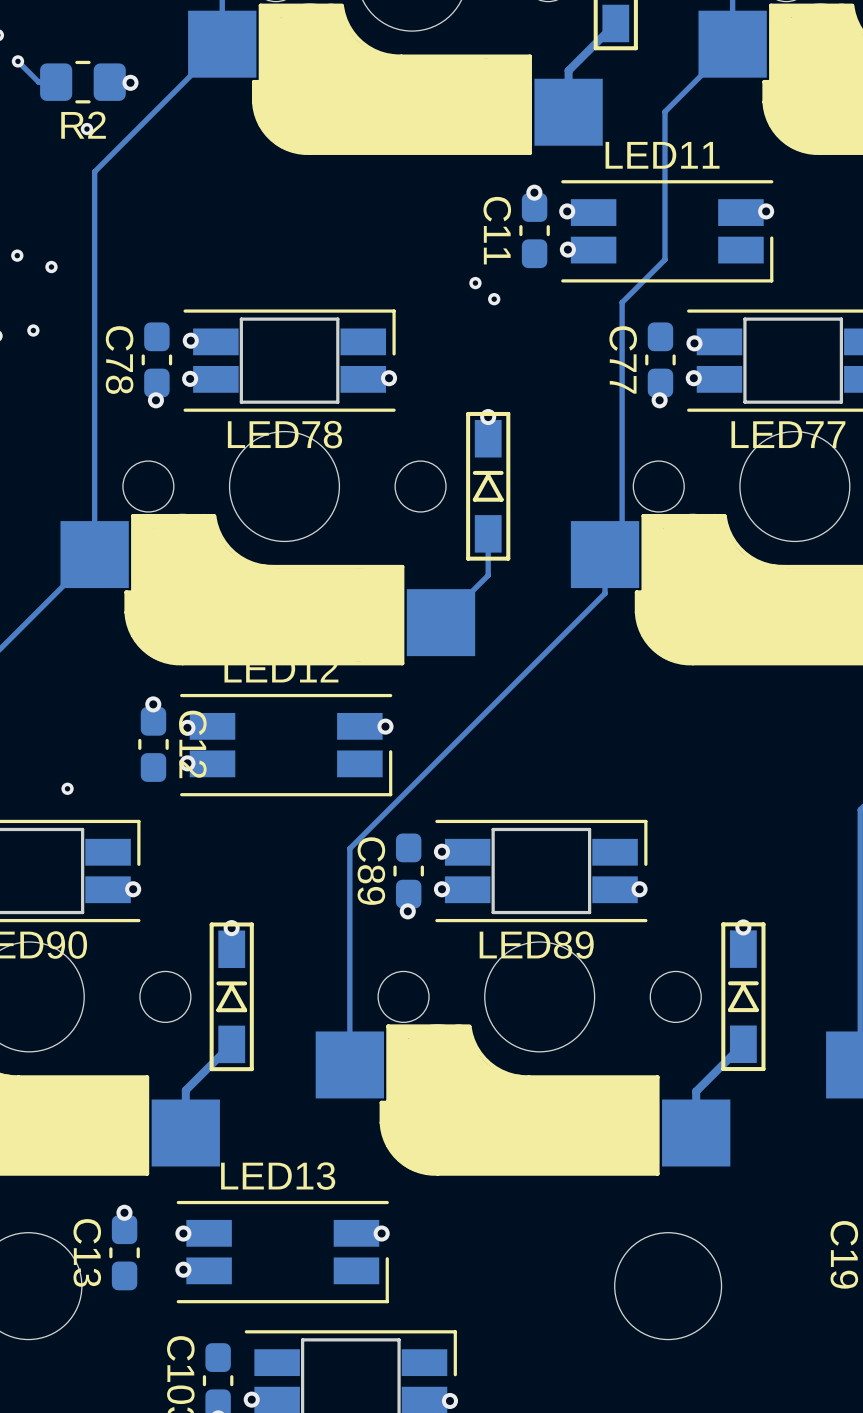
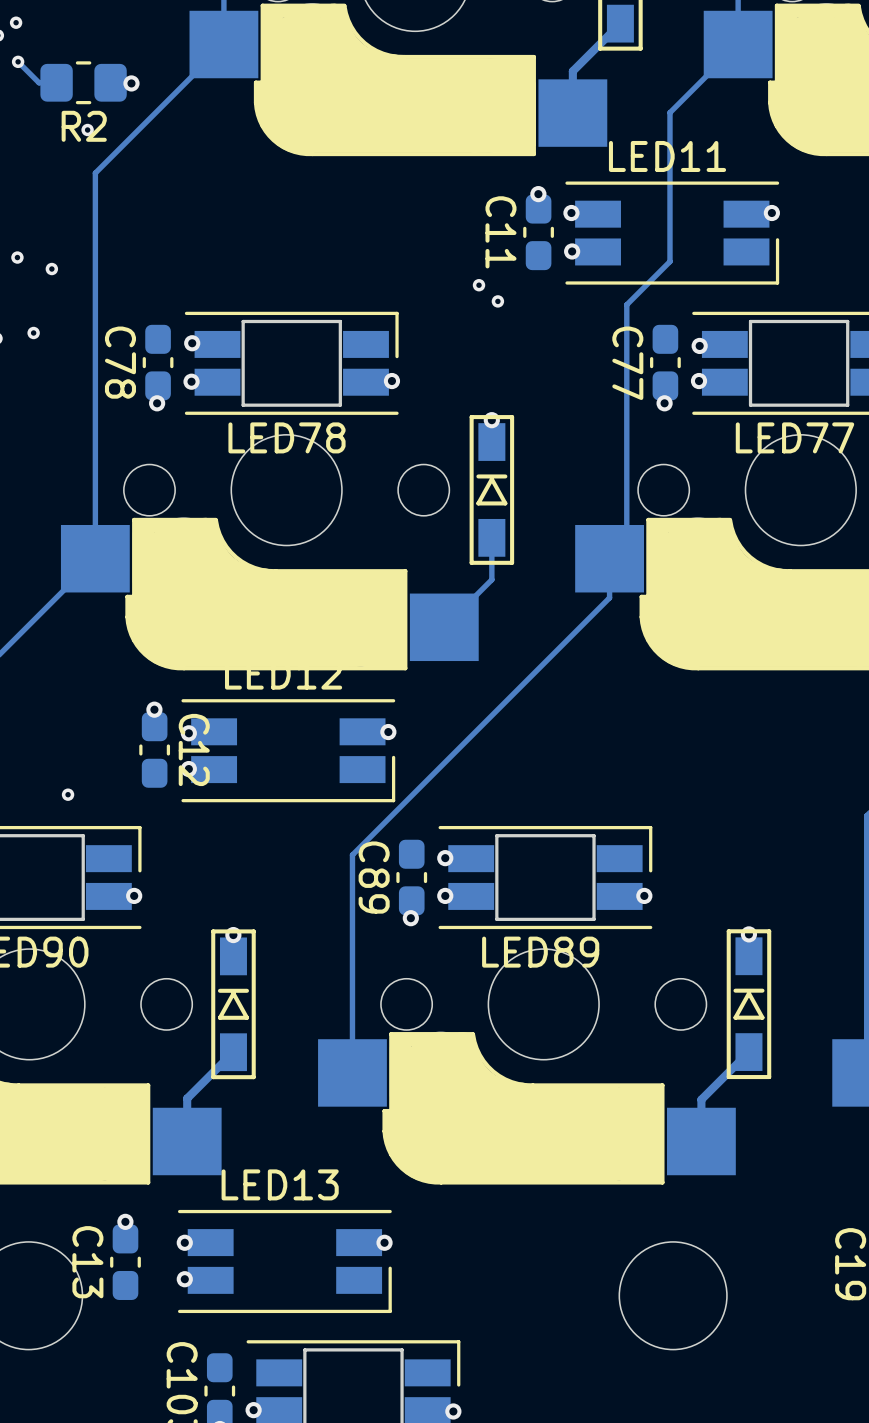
via: none -> (16, 22)

